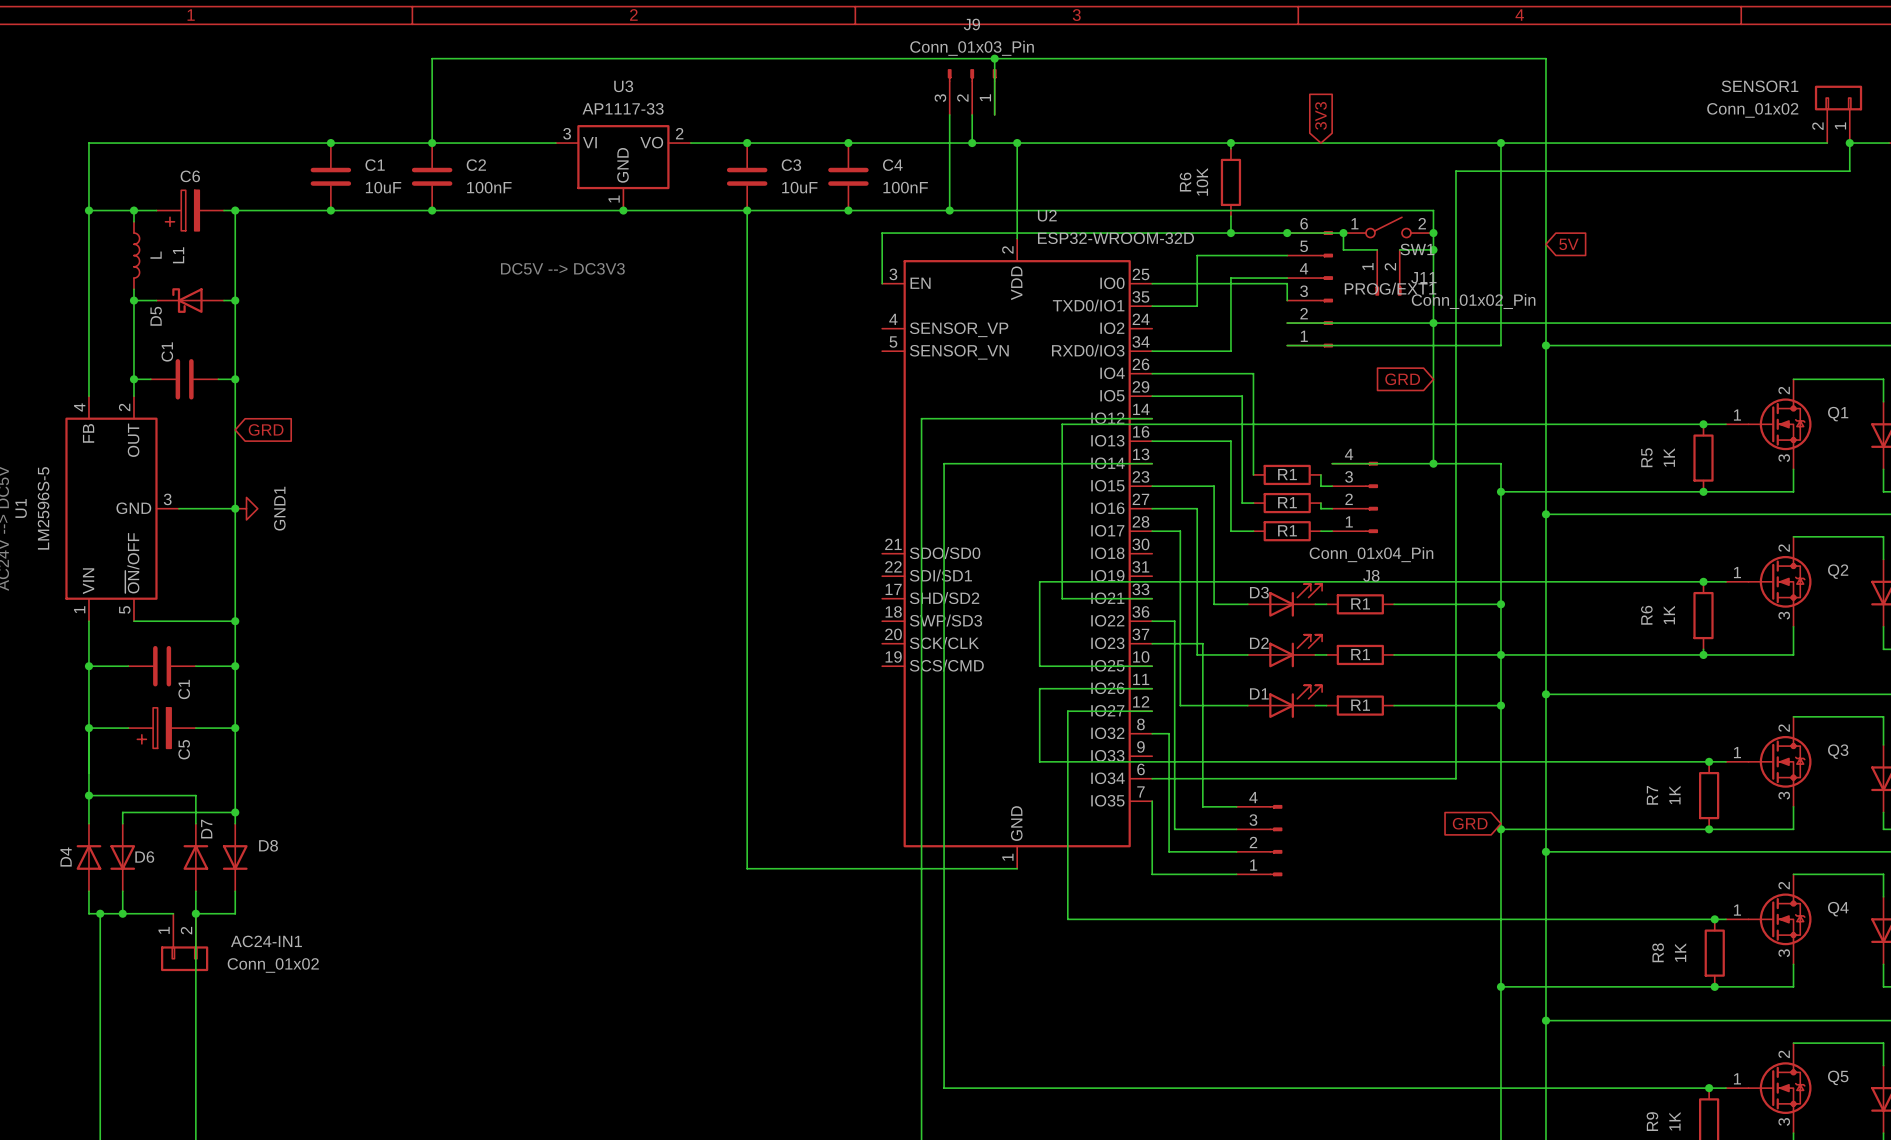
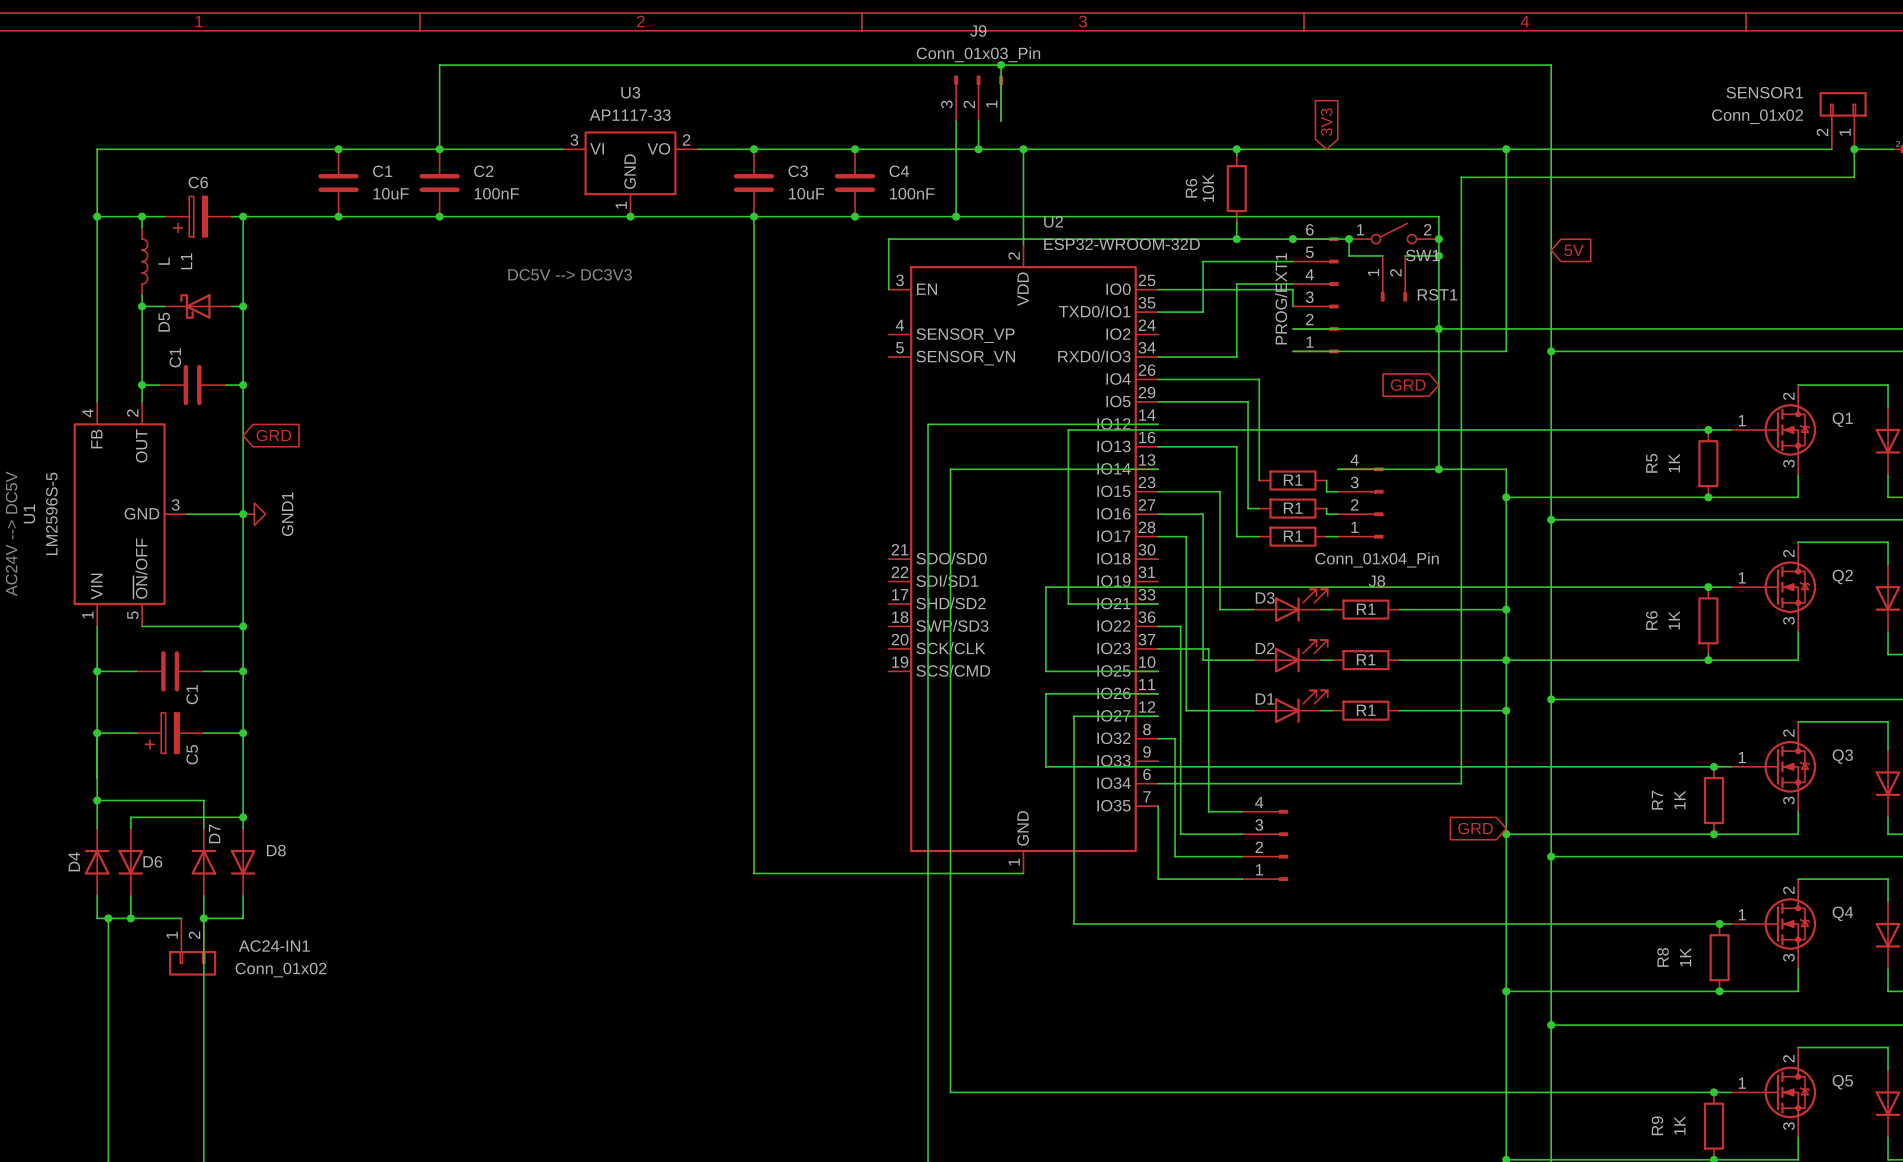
J11 name: J11 (1423, 277) -> RST1 (1437, 294)
PROG/EXT1 name rotation: 0° (1390, 288) -> 90° counterclockwise (1281, 298)
PROG/EXT1 name position: PROG/EXT1 (1390, 288) -> PROG/EXT1 (1281, 298)
J11 value: Conn_01x02_Pin (1473, 301) -> none

